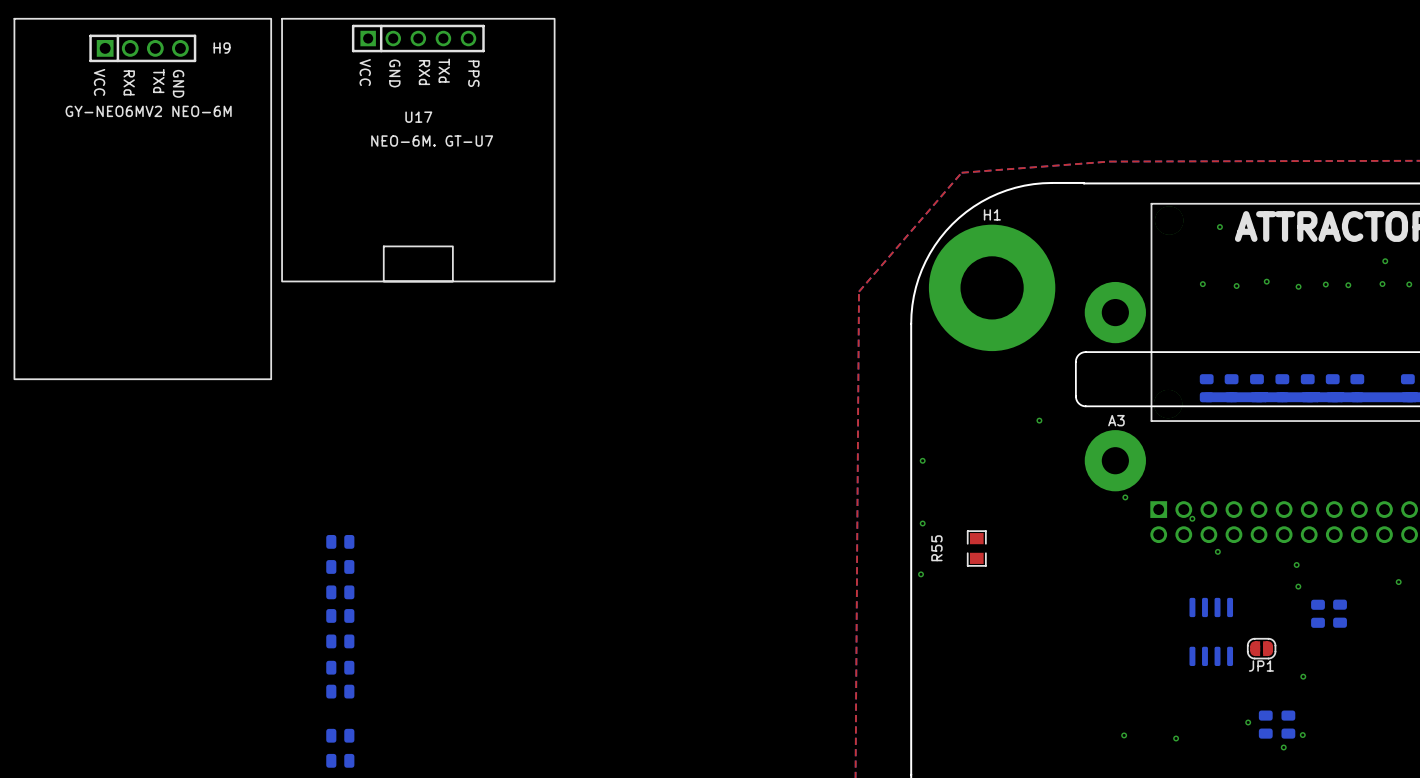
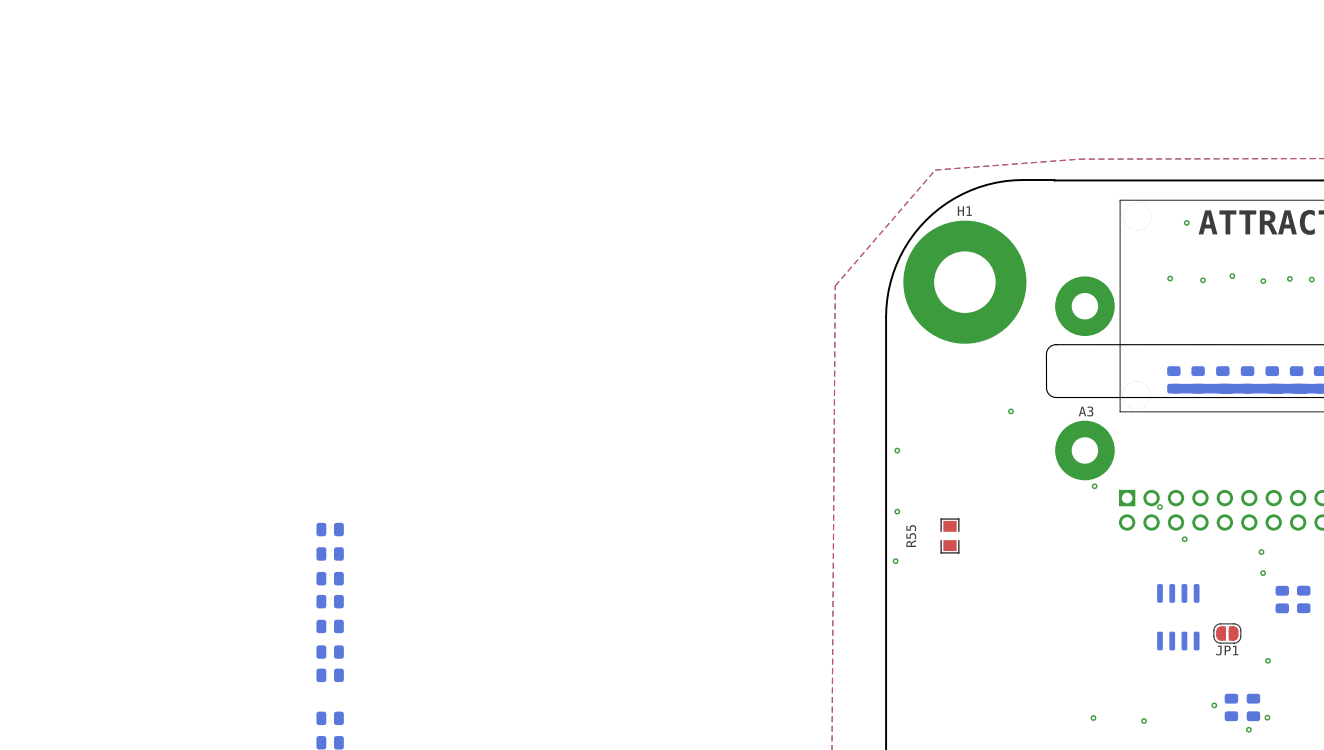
U17: (418, 150) -> none
H9: (142, 199) -> none

